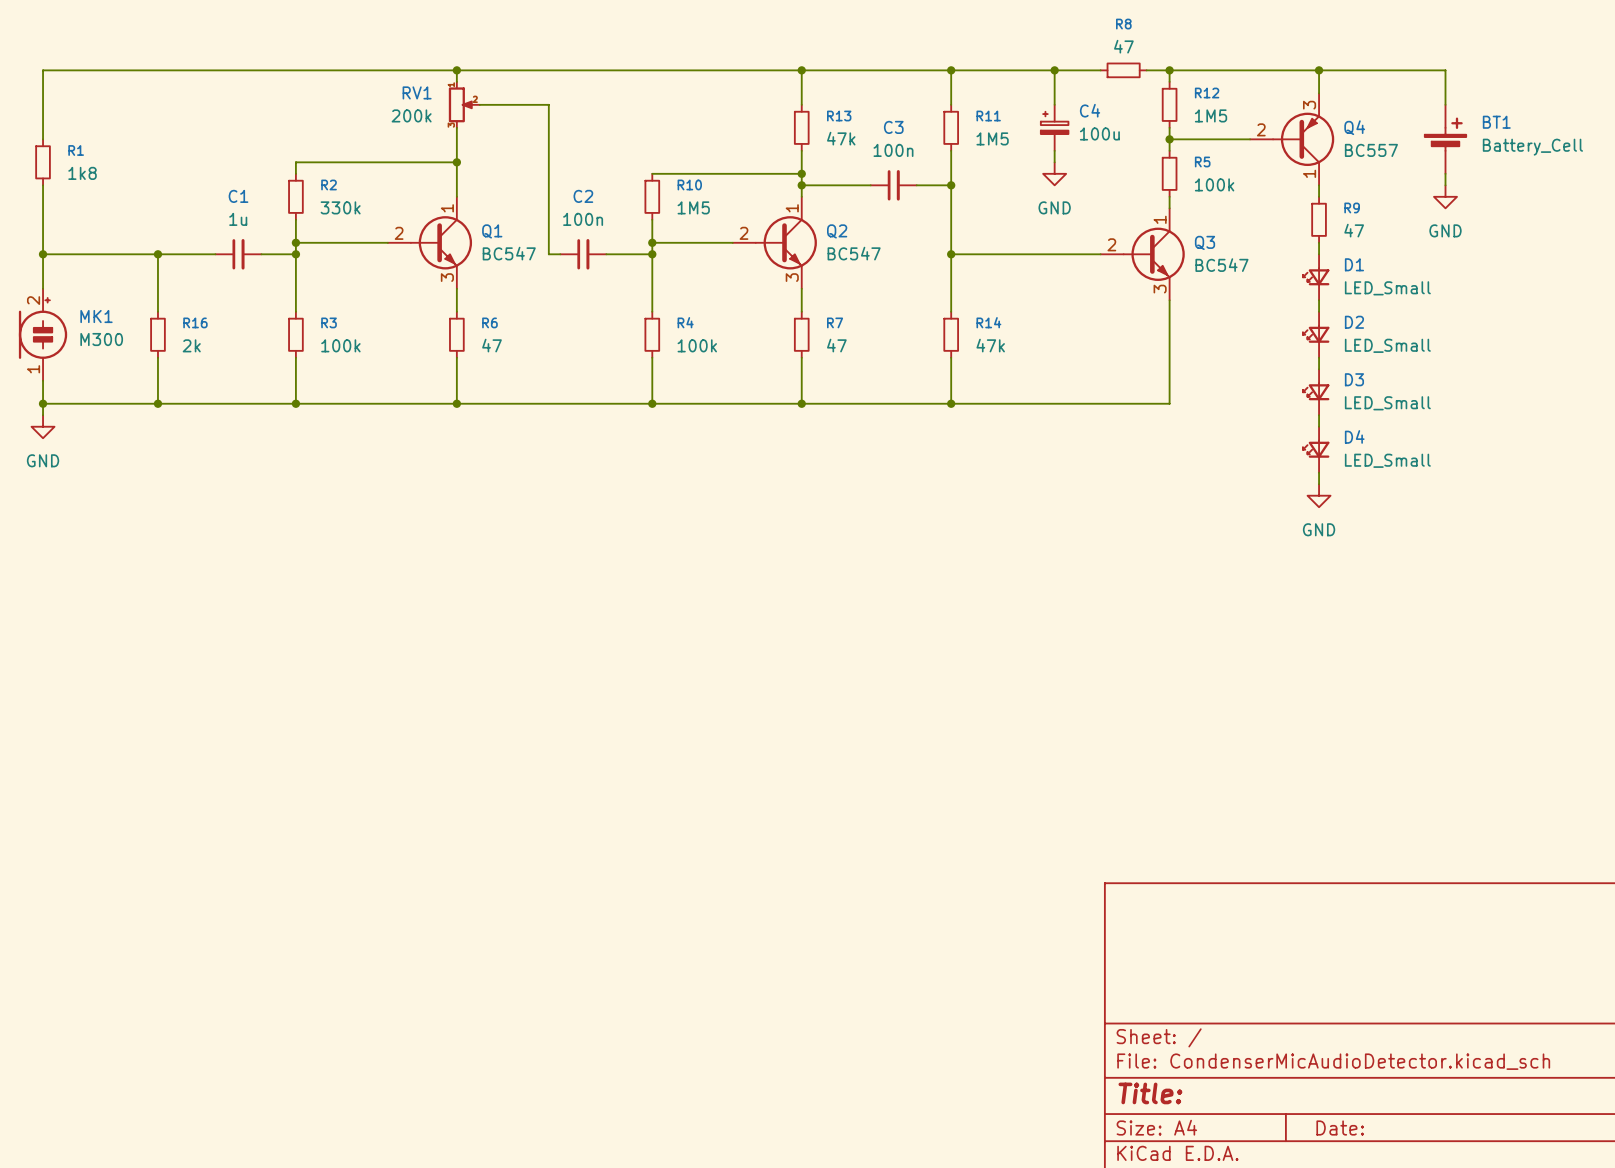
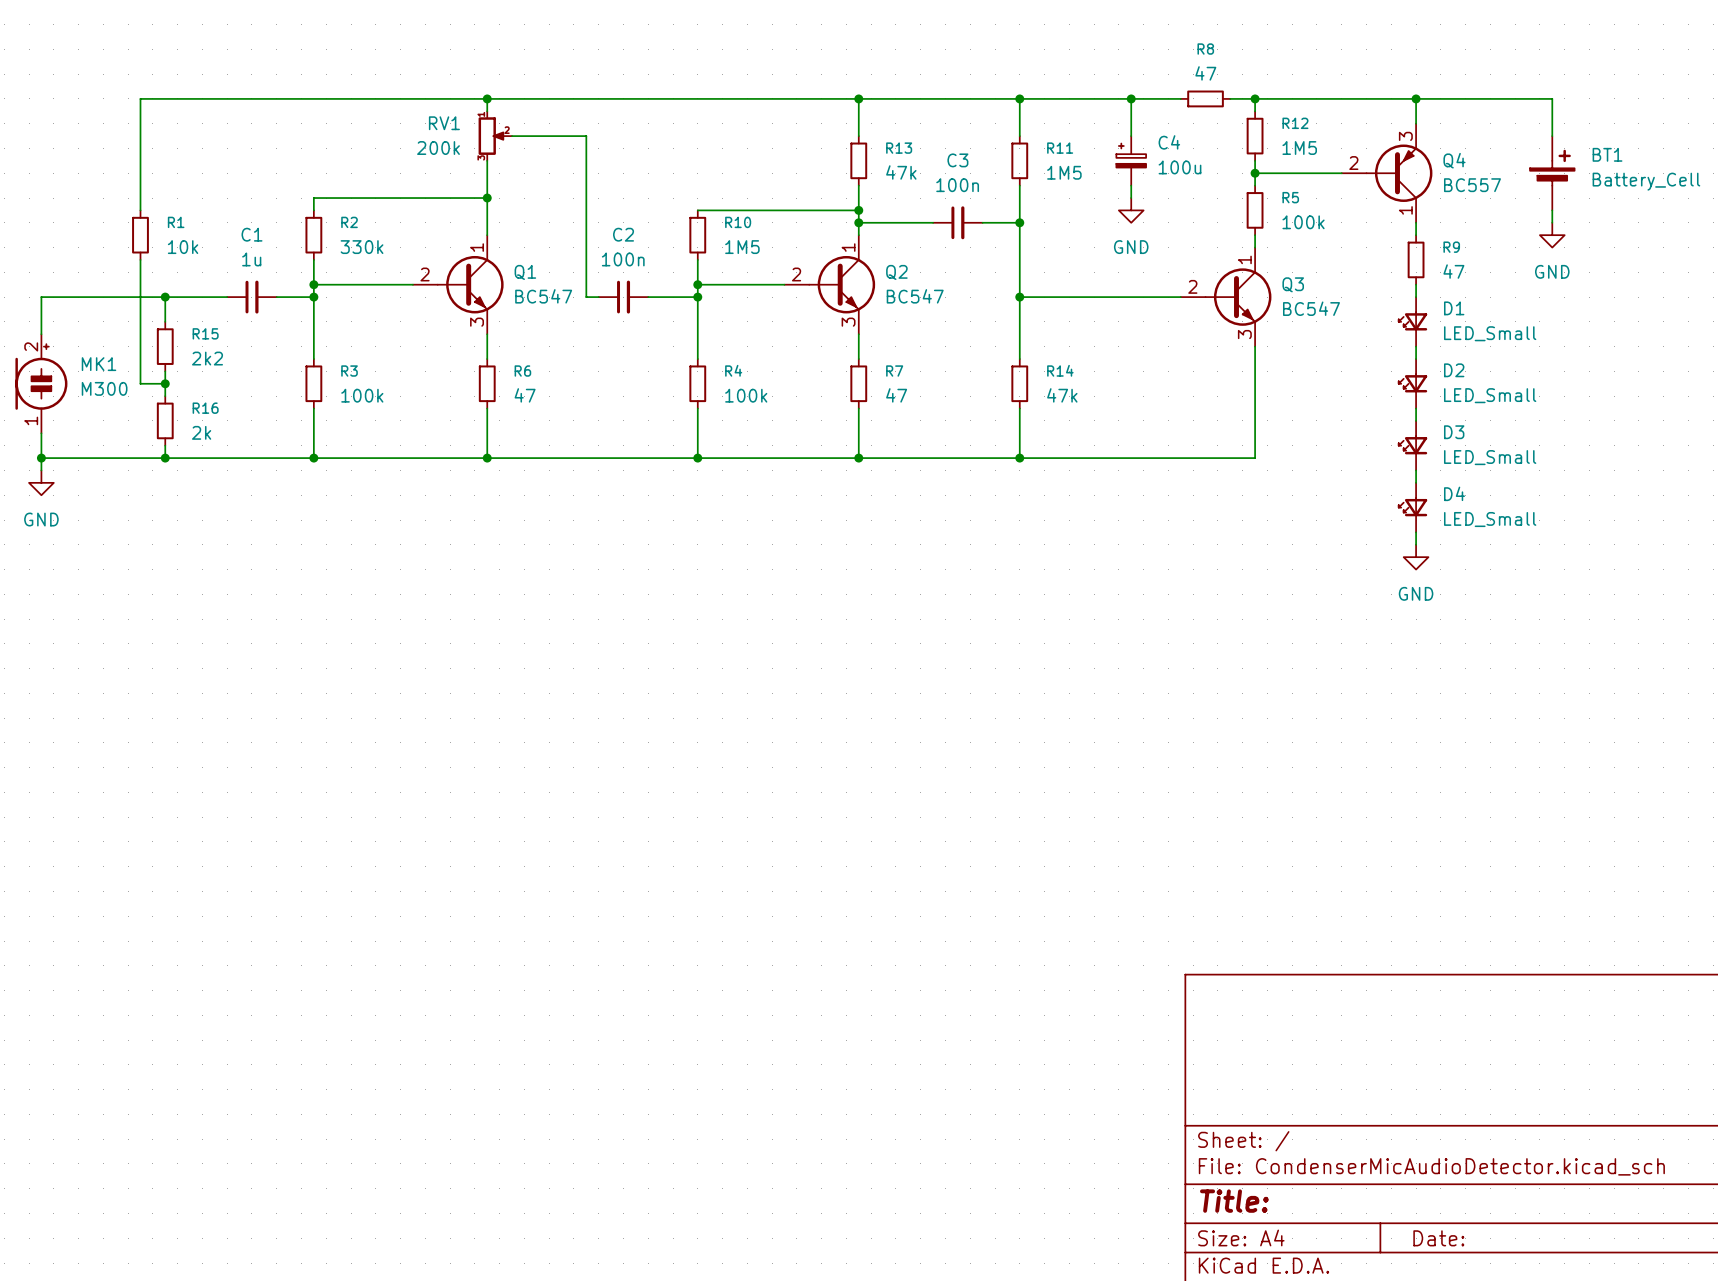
wire: (134, 70) (43, 70) (43, 139) -> (140, 98) (140, 210)
R1 position: (43, 162) -> (140, 235)
R1 value: 1k8 (82, 173) -> 10k (183, 247)
wire: (43, 185) (43, 254) -> none
wire: none -> (140, 259) (140, 383) (165, 383)
junction: (43, 254) -> none
wire: (157, 277) (157, 311) -> none
R15: none -> 2k2 (165, 346)
wire: none -> (165, 371) (165, 396)
junction: none -> (165, 383)
R16 position: (157, 334) -> (165, 420)
wire: (157, 357) (157, 392) -> none

